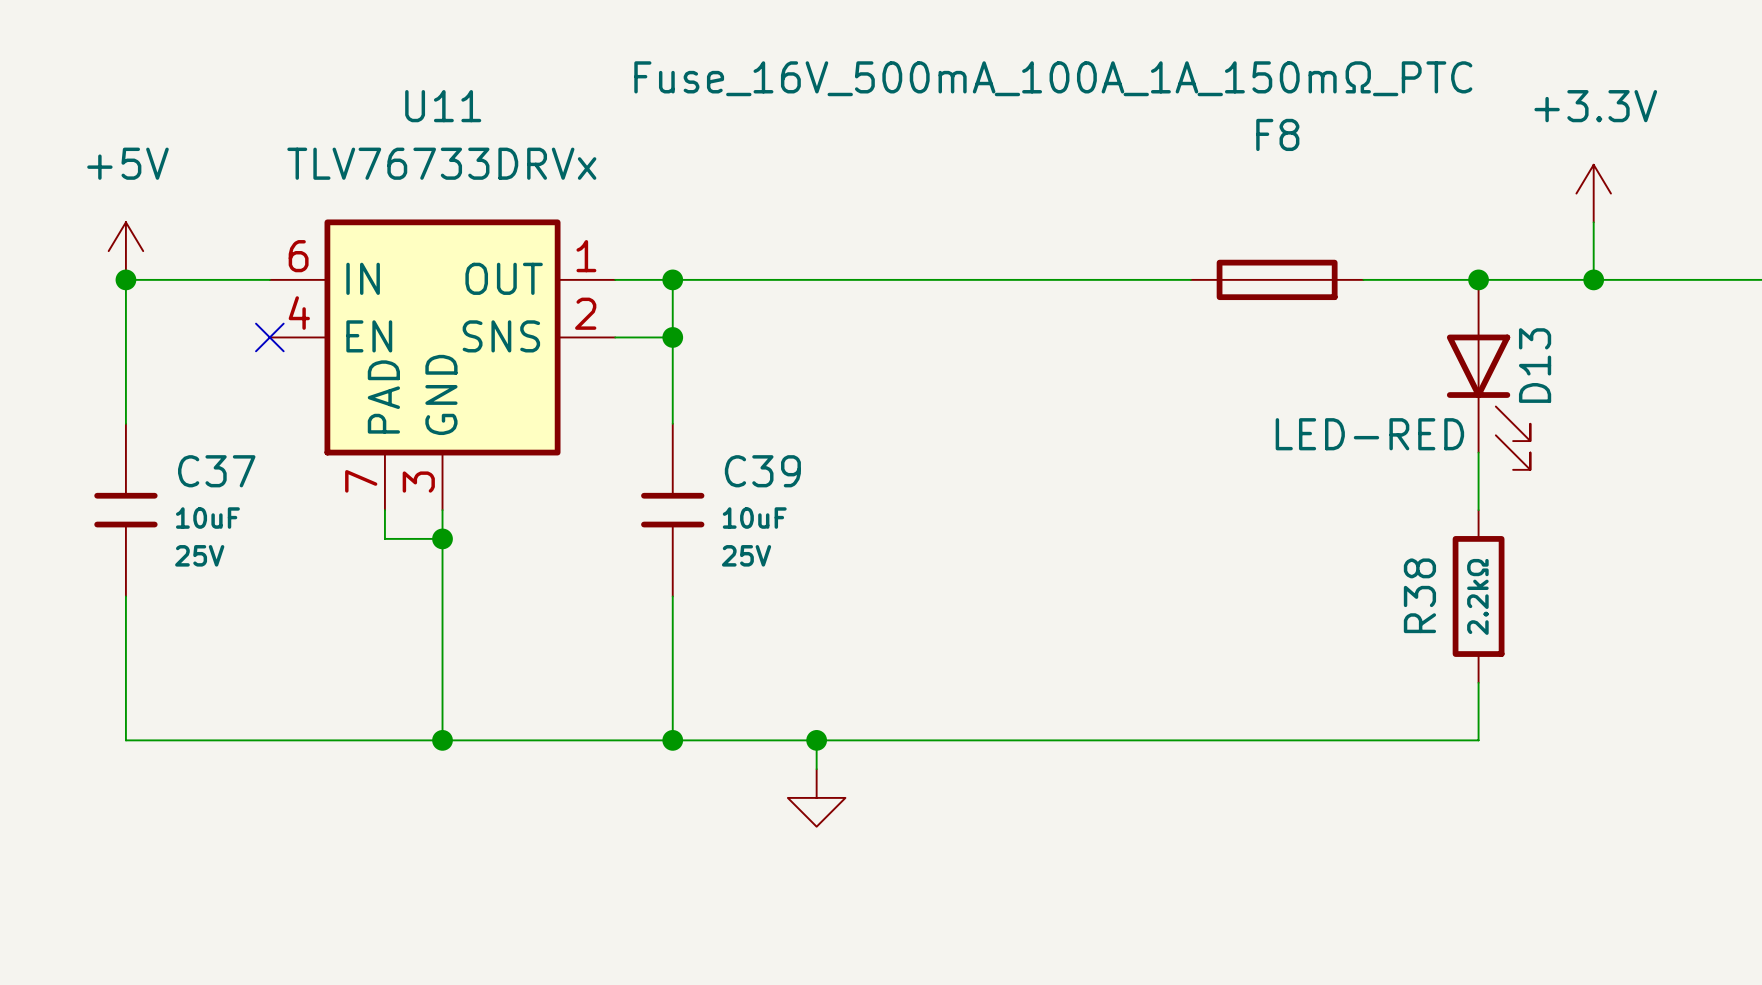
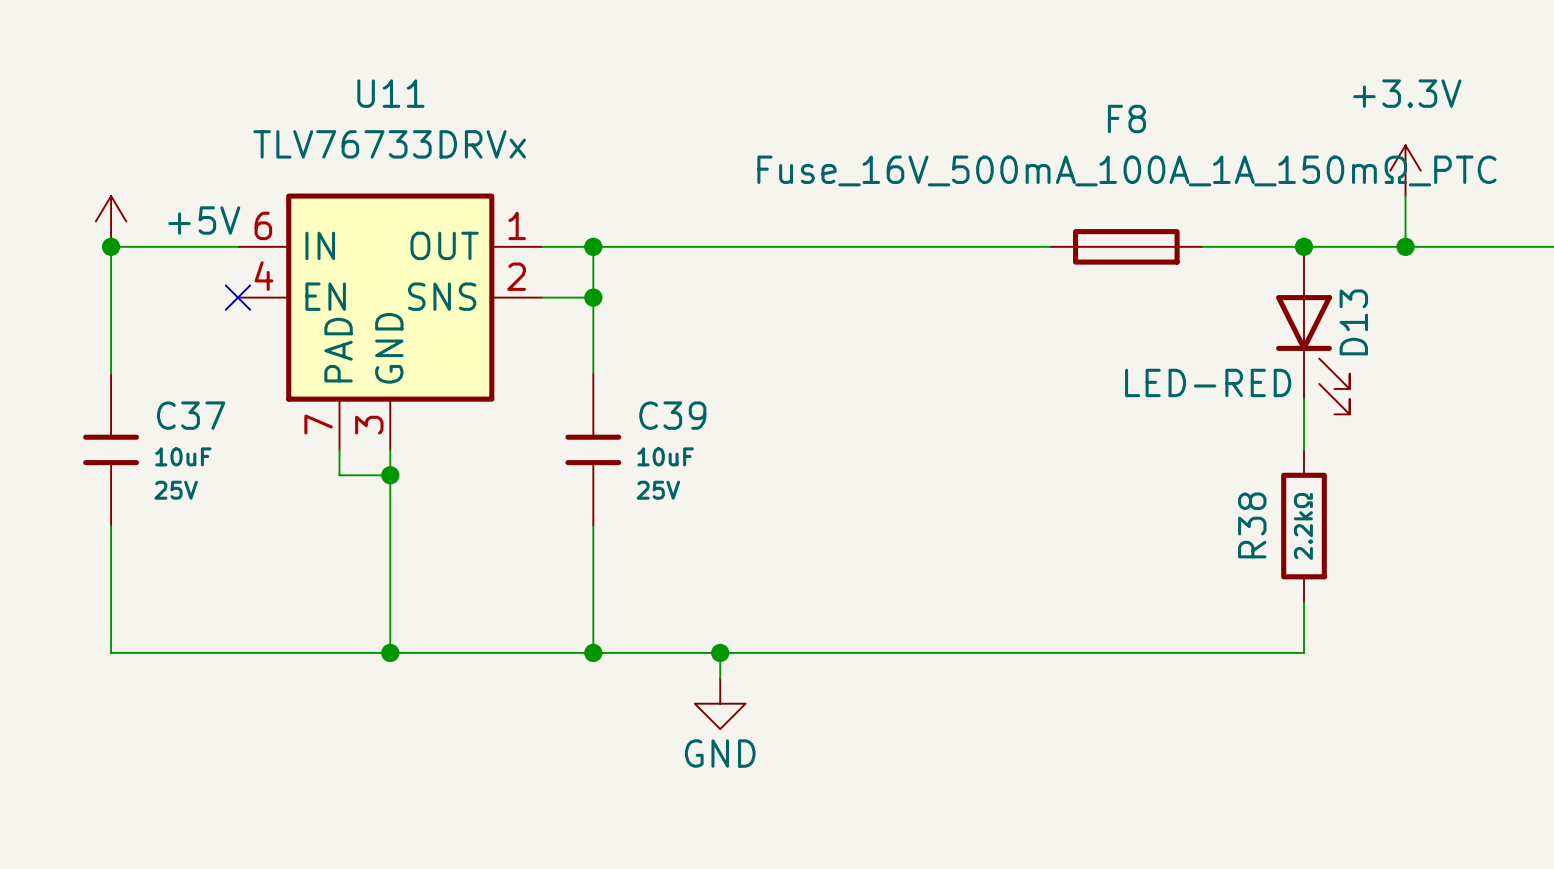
F8 value position: Fuse_16V_500mA_100A_1A_150mΩ_PTC (1053, 78) -> Fuse_16V_500mA_100A_1A_150mΩ_PTC (1126, 170)
power symbol text position: +5V (127, 163) -> +5V (204, 220)
power symbol text: none -> GND (720, 753)

